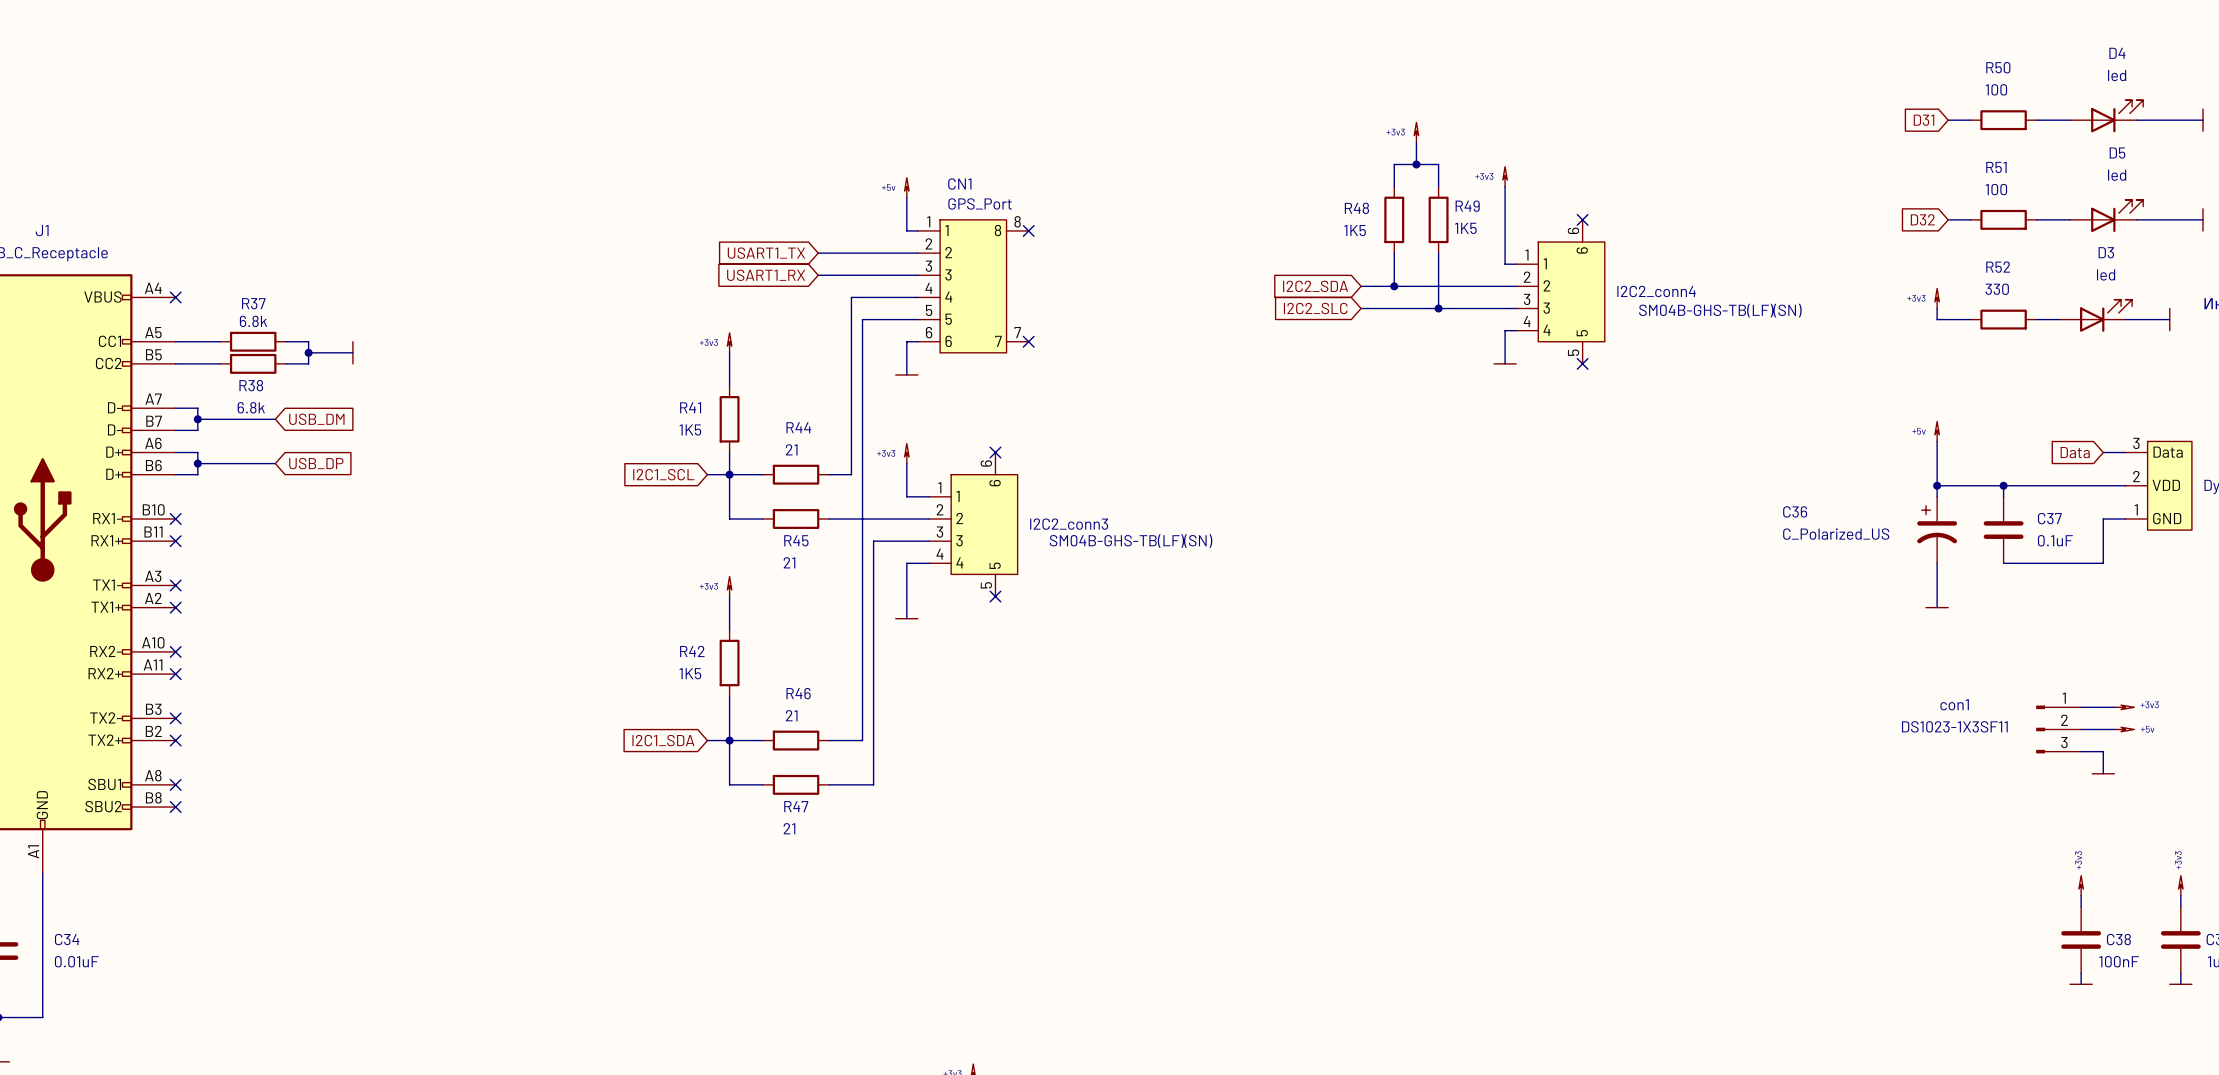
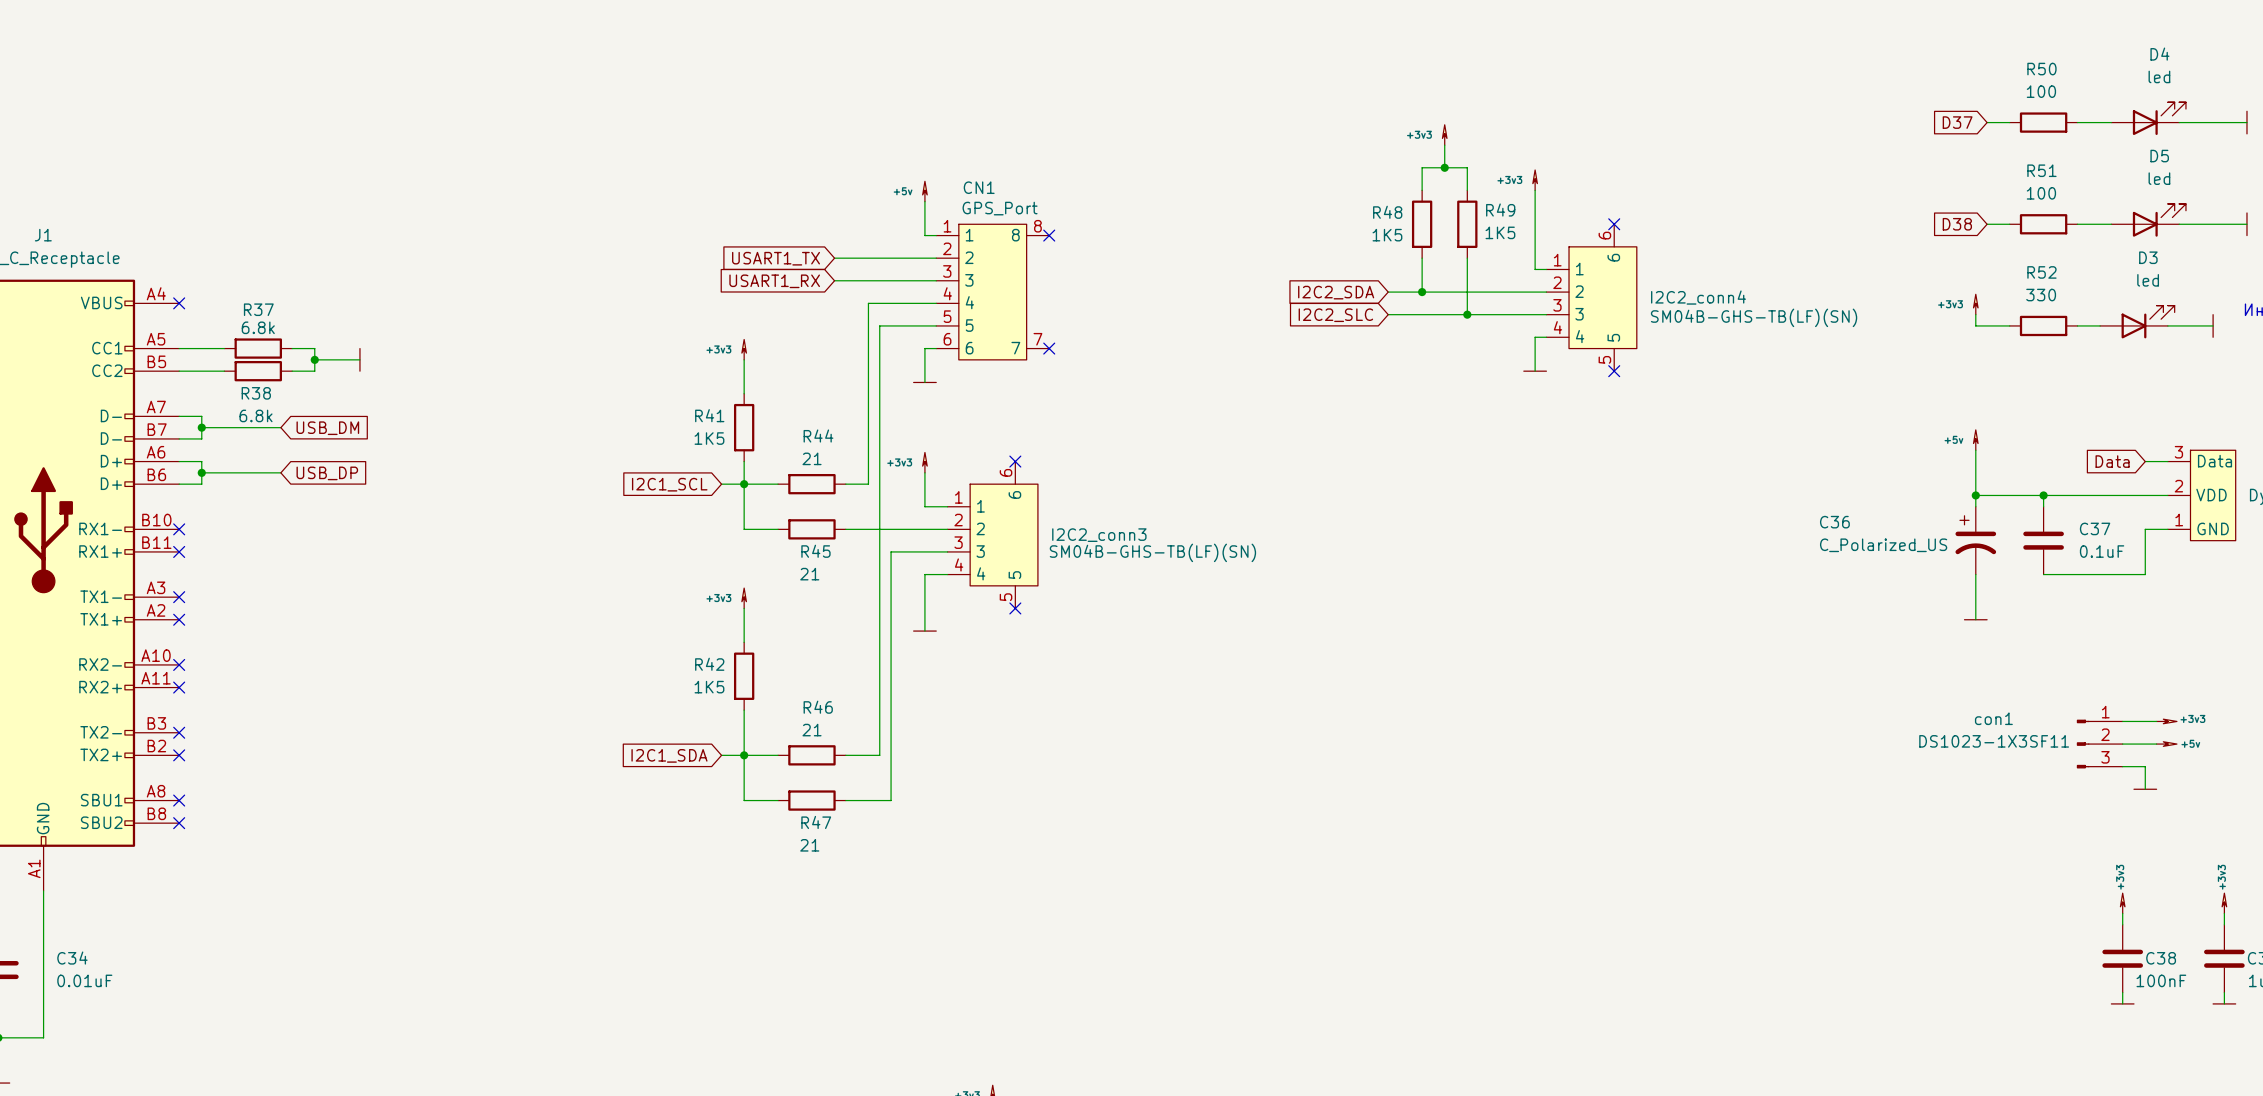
global label: D31 (1924, 120) -> D37 (1957, 122)
global label: D32 (1922, 219) -> D38 (1957, 224)

